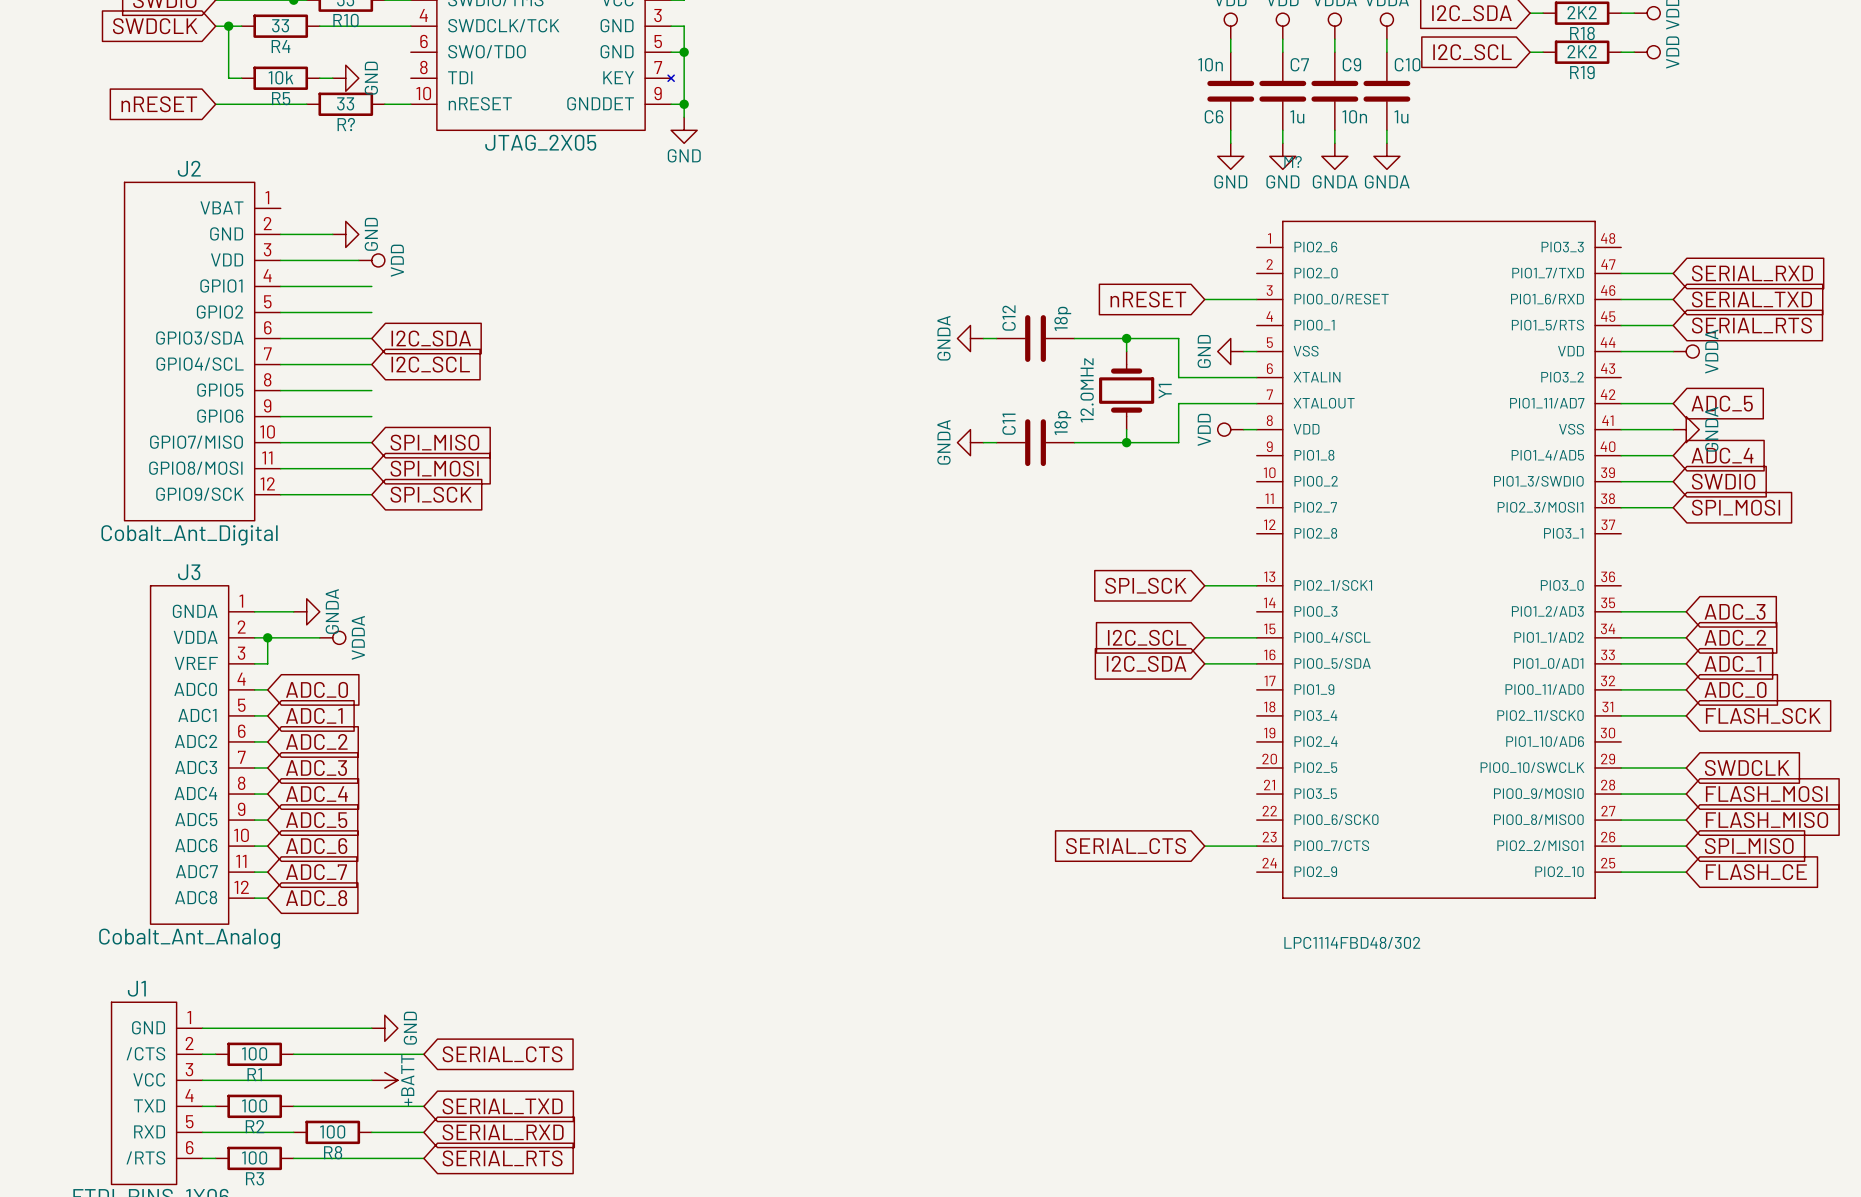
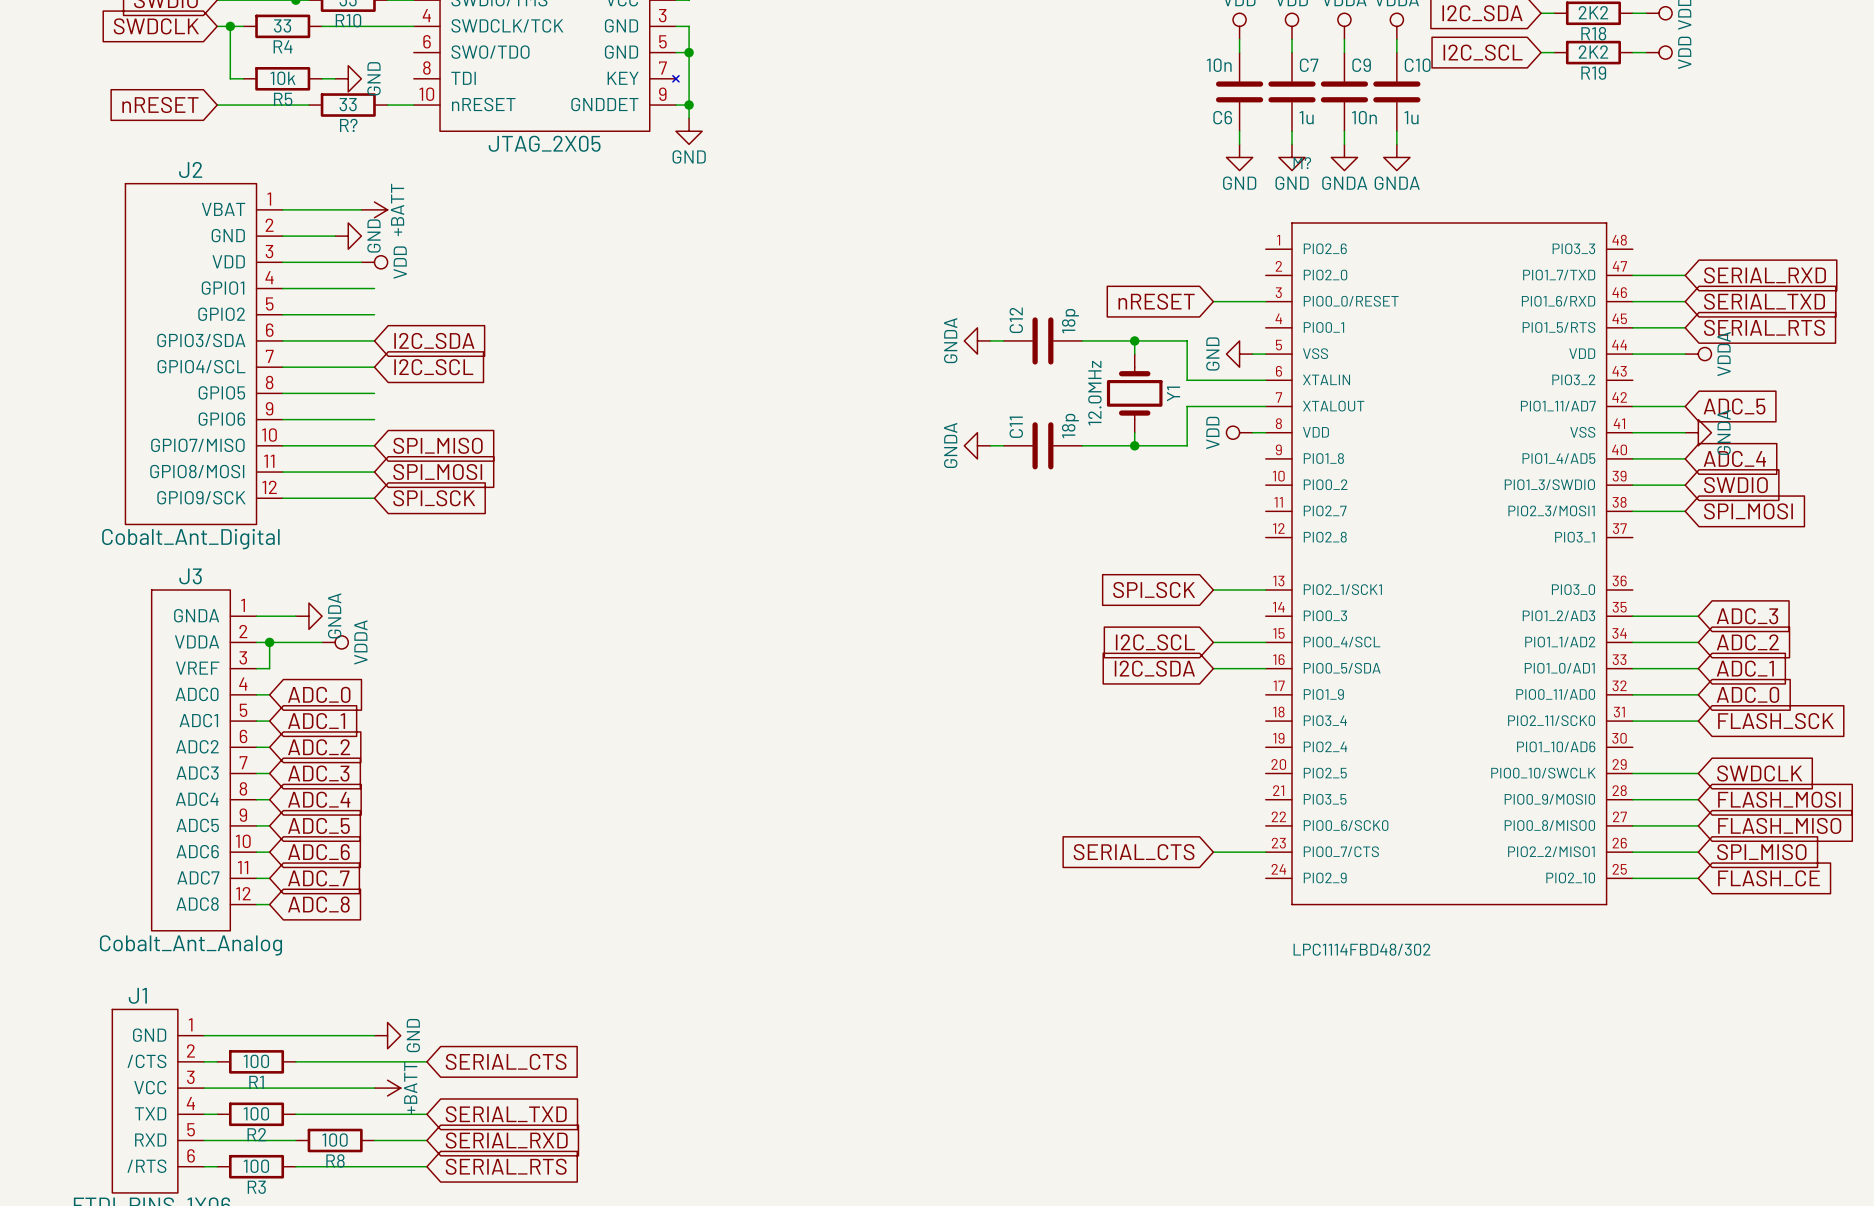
wire: none -> (282, 209) (361, 209)
power symbol: none -> +BATT (374, 209)

